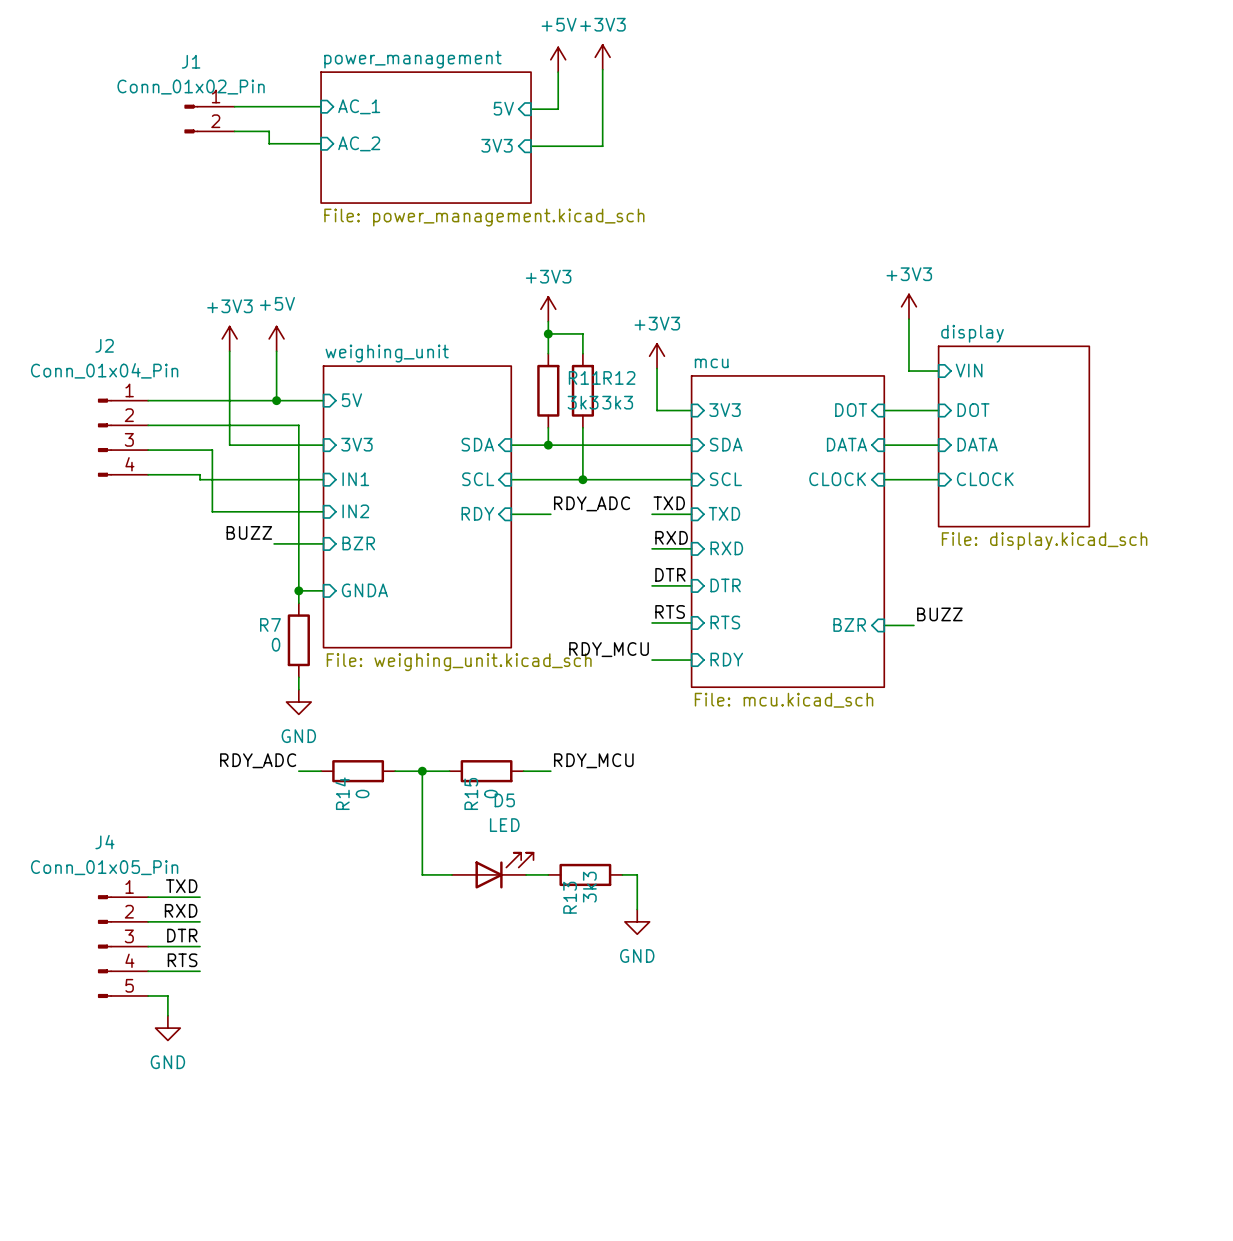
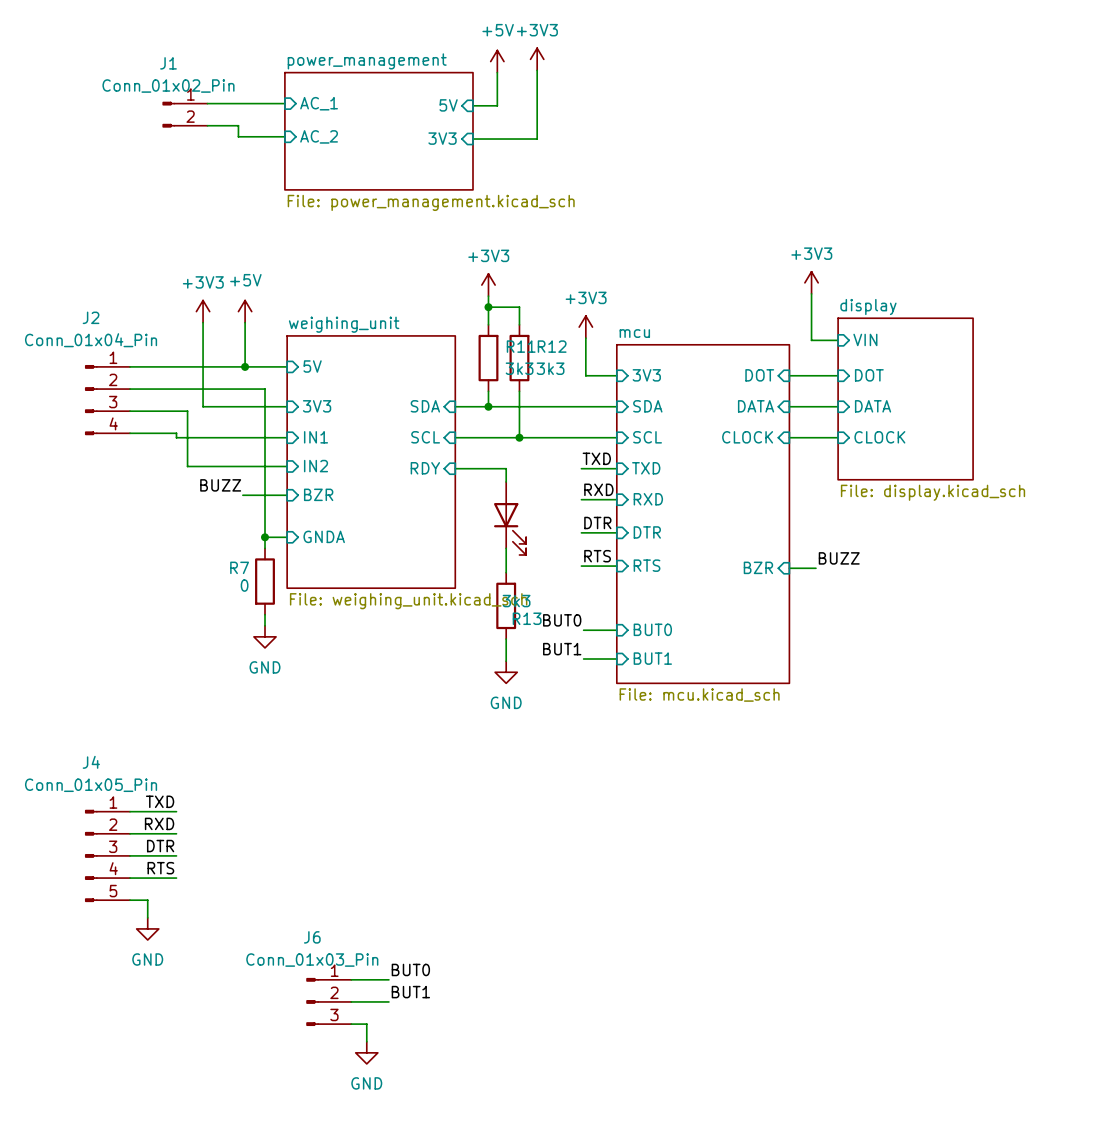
label: RDY_ADC (592, 503) -> none
wire: none -> (490, 468) (506, 468) (506, 481)
sheet mcu: File: mcu.kicad_sch (787, 531) -> none
sheet mcu: none -> File: mcu.kicad_sch (703, 514)
part: none -> (510, 518)
wire: none -> (506, 548) (506, 572)
label: RDY_MCU (609, 649) -> none
sheet pin: RDY (726, 659) -> none
wire: (652, 660) (691, 660) -> none
label: none -> BUT0 (562, 620)
wire: none -> (583, 630) (616, 630)
sheet pin: none -> BUT0 (652, 629)
wire: none -> (506, 639) (506, 661)
label: none -> BUT1 (562, 649)
wire: none -> (583, 659) (616, 659)
sheet pin: none -> BUT1 (652, 658)
power symbol: none -> GND (506, 672)
label: RDY_ADC (258, 760) -> none
label: RDY_MCU (593, 760) -> none
wire: (298, 771) (321, 771) -> none
R14: 0 (358, 771) -> none
wire: (395, 771) (449, 771) -> none
wire: (422, 771) (422, 874) (451, 874) -> none
junction: (422, 771) -> none
R15: 0 (486, 771) -> none
wire: (523, 771) (550, 771) -> none
D5: LED (492, 870) -> none
wire: (526, 874) (548, 874) -> none
R13 rotation: 0° (585, 874) -> 90° clockwise (506, 605)
R13 position: (585, 874) -> (506, 605)
wire: (622, 874) (637, 874) (637, 909) -> none
R13 name position: R13 (570, 897) -> R13 (527, 618)
power symbol: GND (637, 921) -> none
label: none -> BUT0 (410, 969)
wire: none -> (351, 979) (388, 979)
label: none -> BUT1 (410, 992)
J6: none -> Conn_01x03_Pin (328, 1001)
wire: none -> (351, 1001) (388, 1001)
wire: none -> (351, 1024) (366, 1024) (366, 1041)
power symbol: none -> GND (366, 1052)

